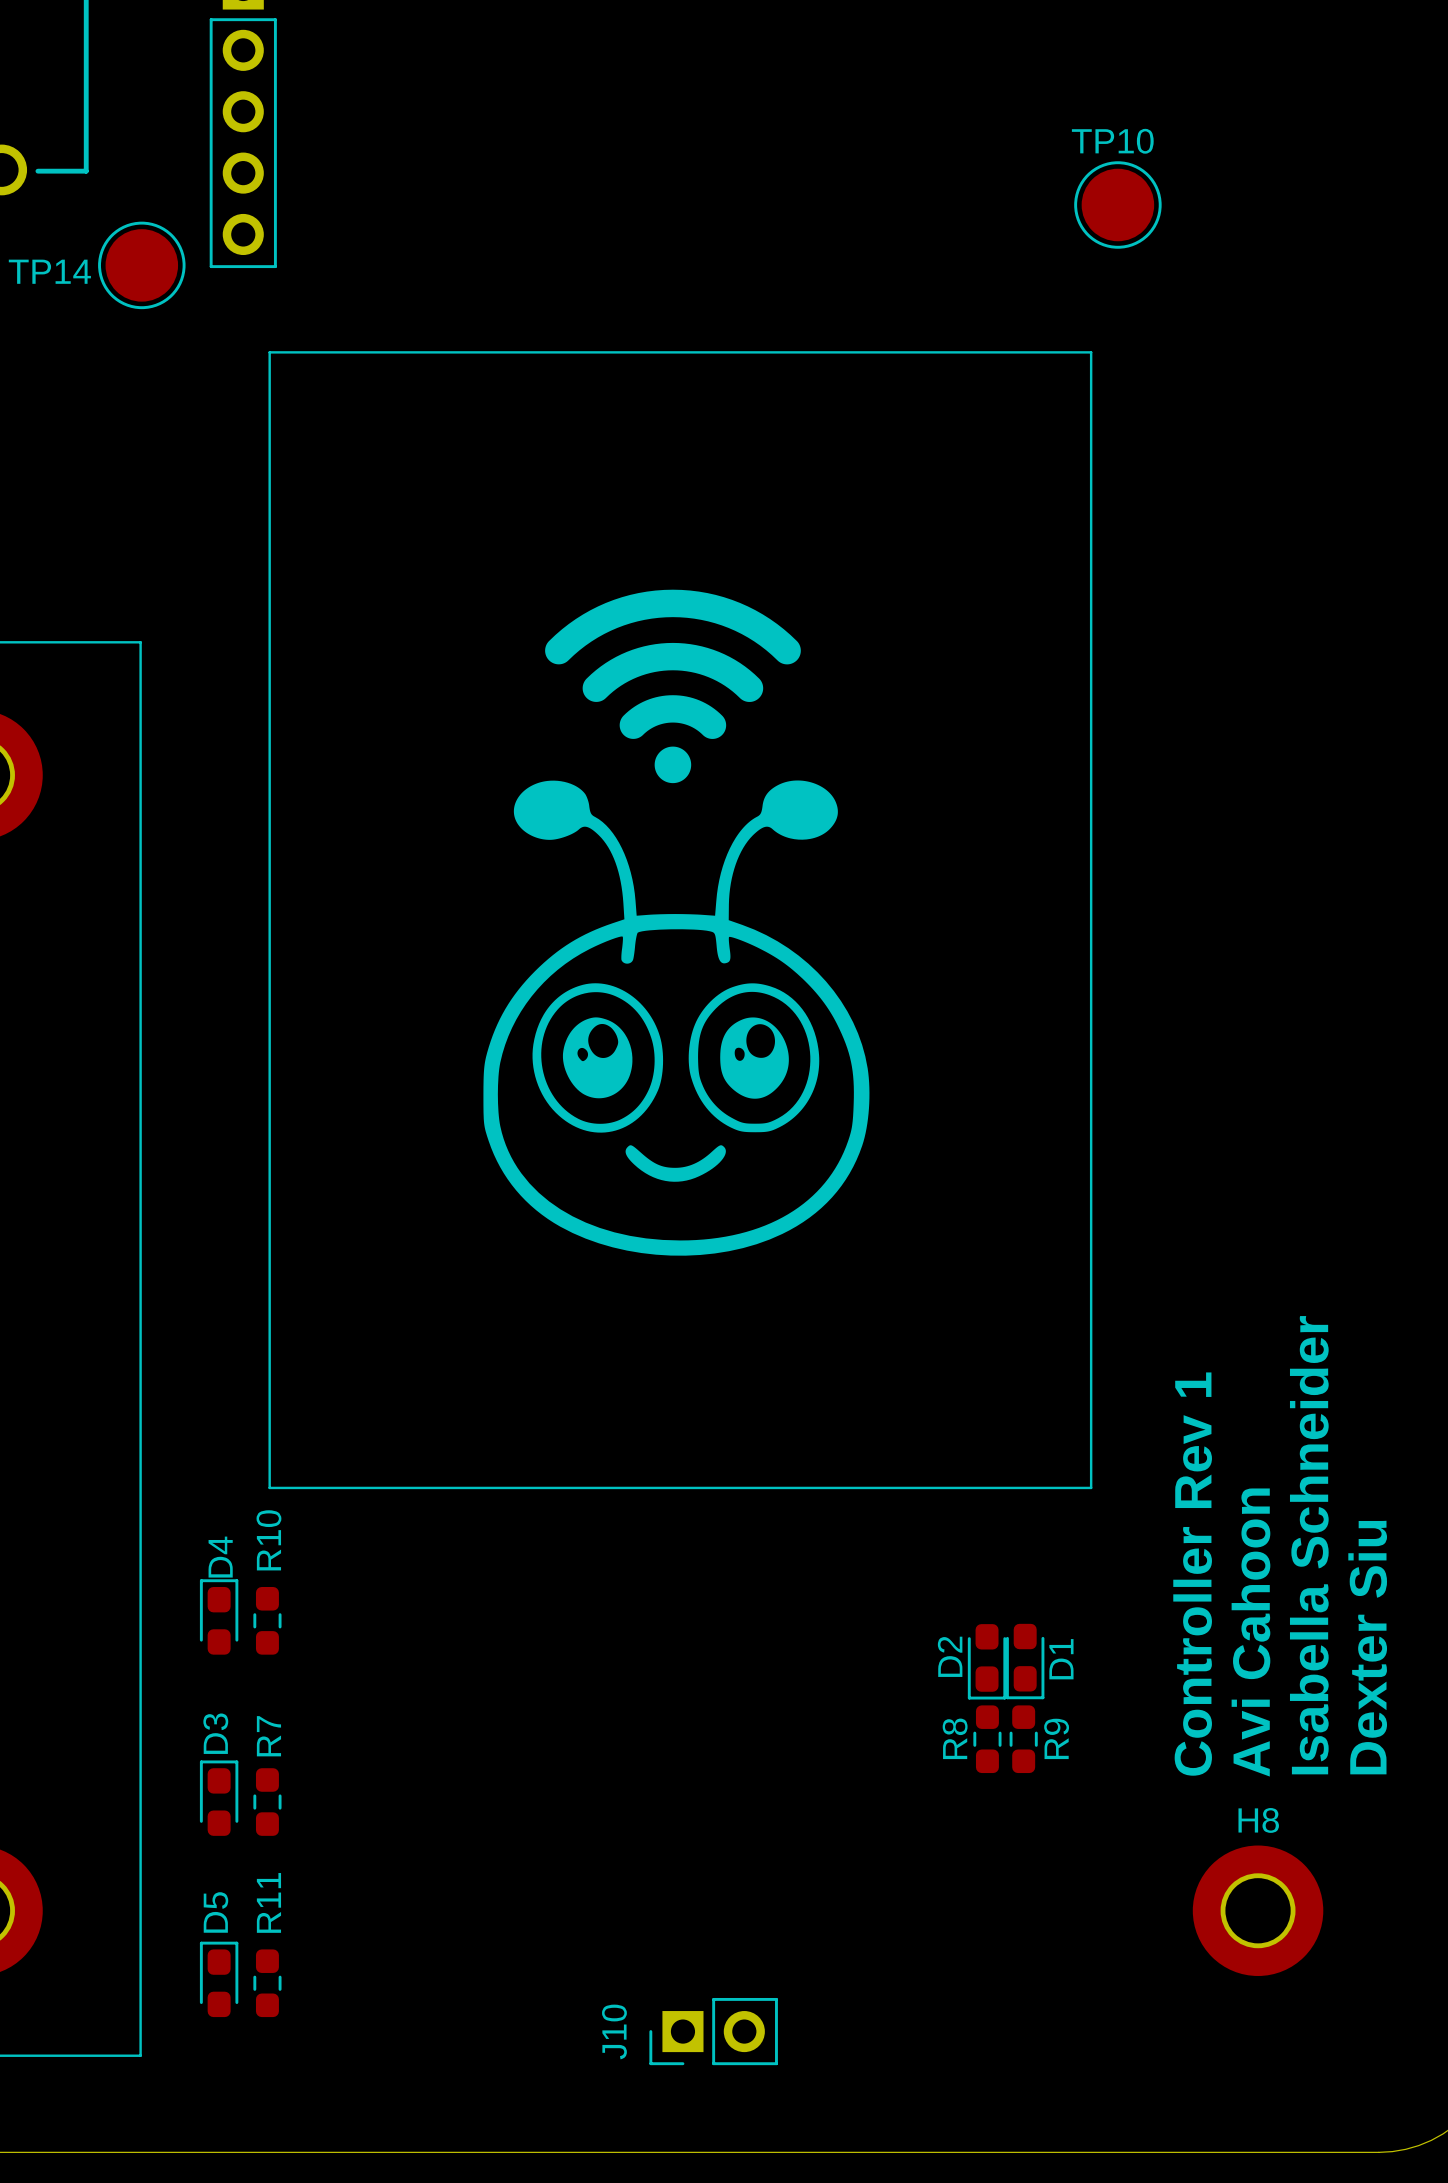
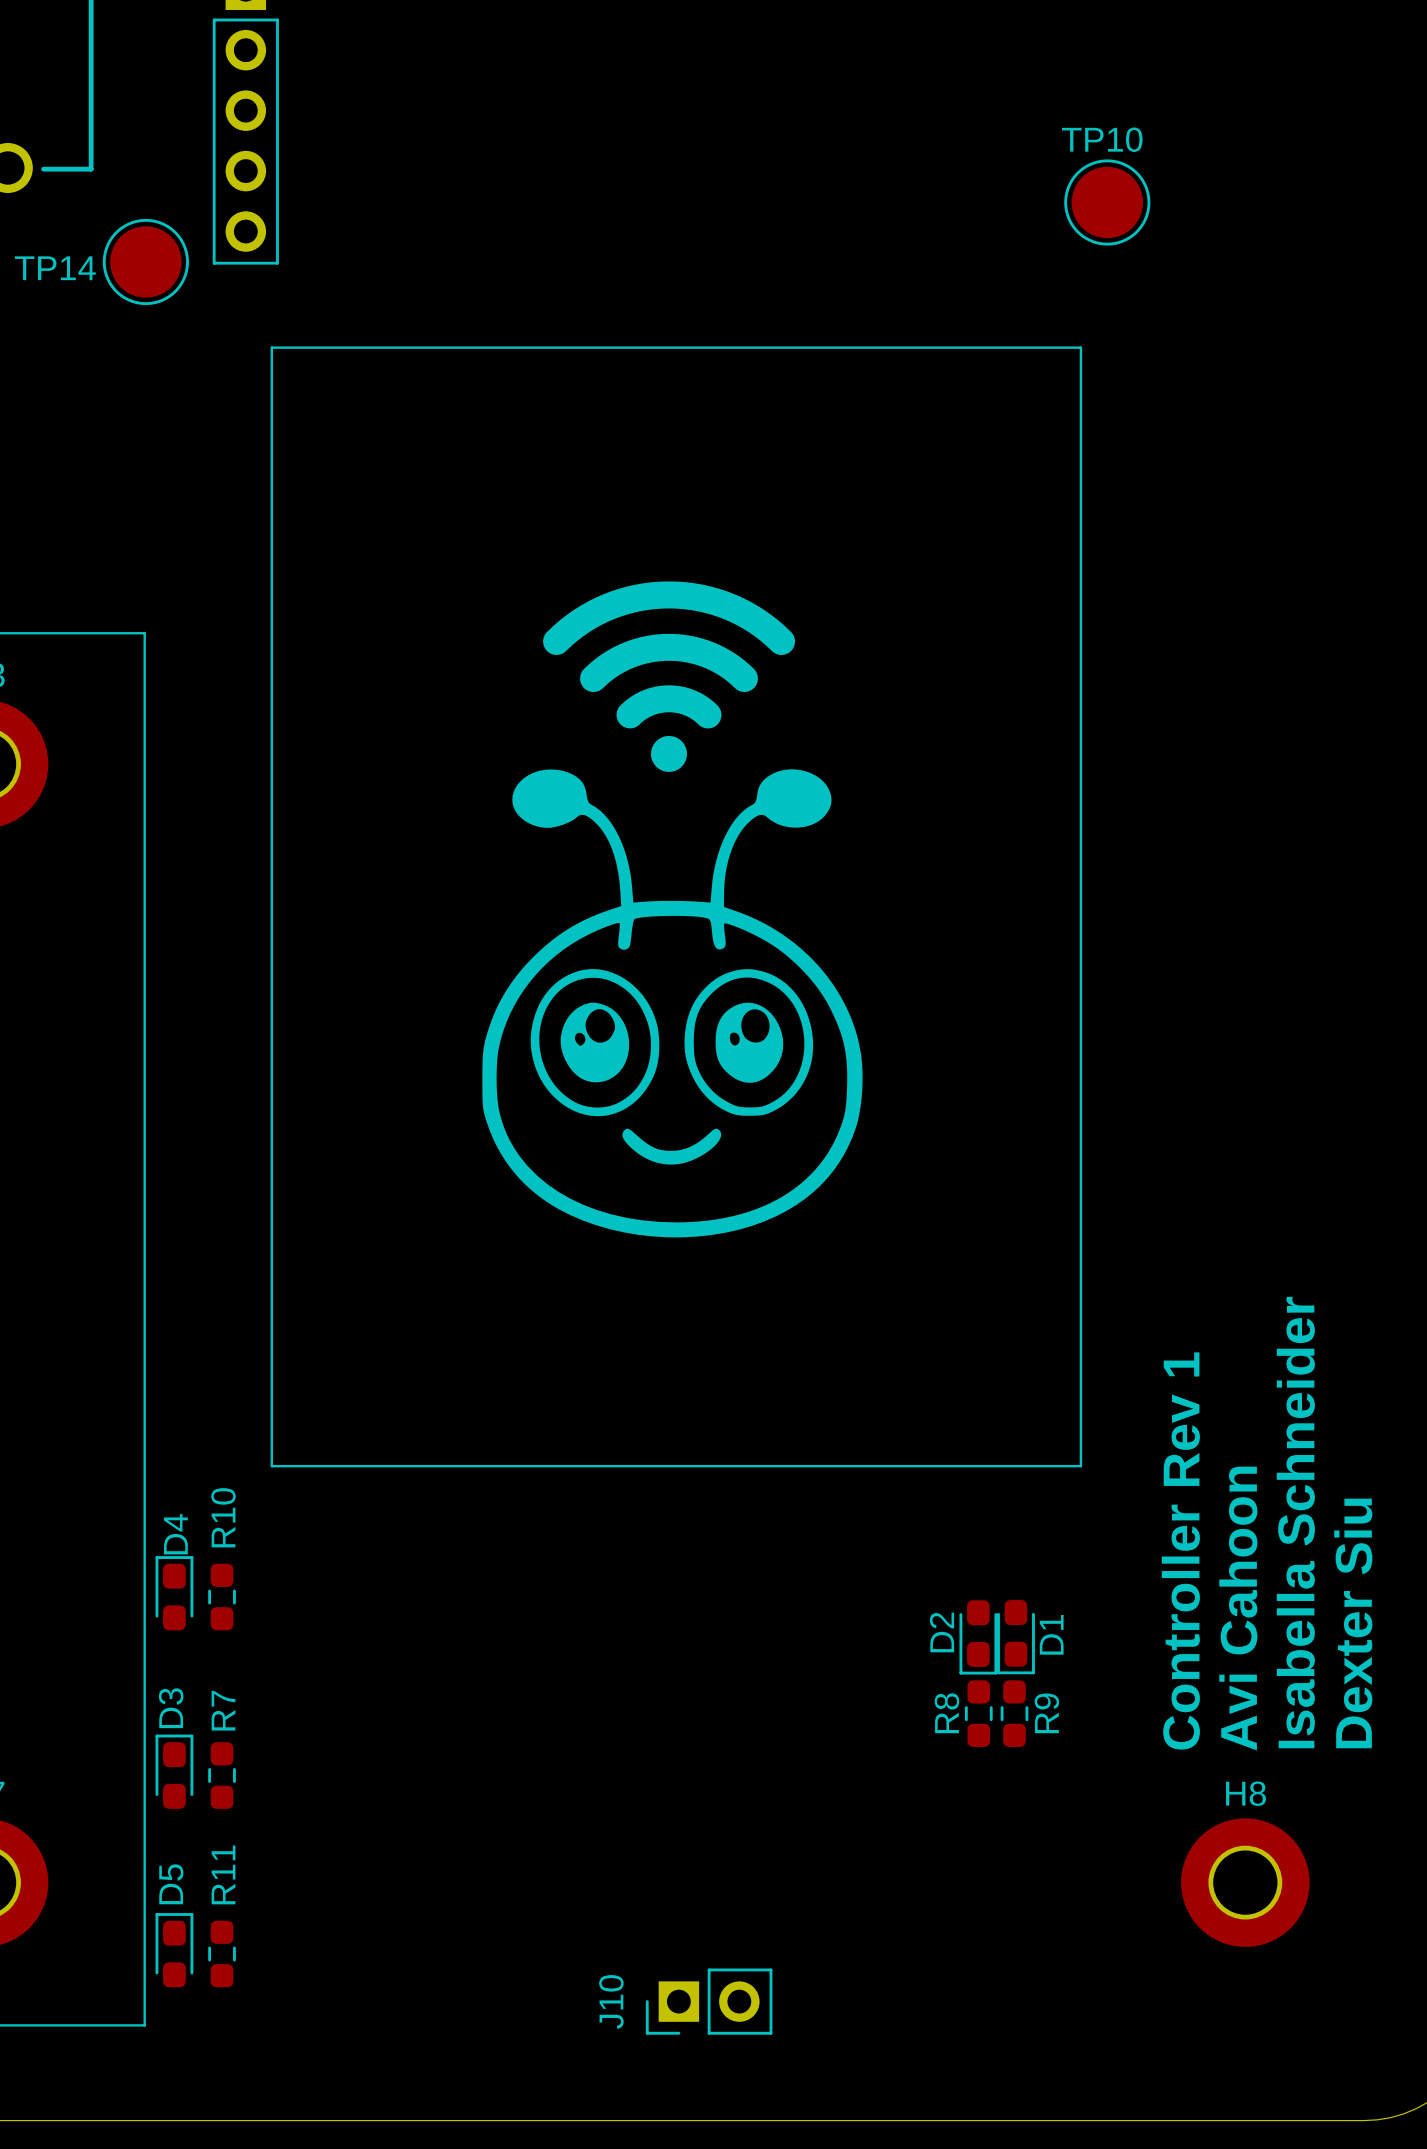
D4 position: (219, 1616) -> (174, 1593)
R10 position: (267, 1620) -> (222, 1597)
D3 position: (219, 1798) -> (174, 1771)
R7 position: (267, 1802) -> (222, 1775)
D5 position: (219, 1979) -> (174, 1950)
R11 position: (267, 1983) -> (222, 1954)

